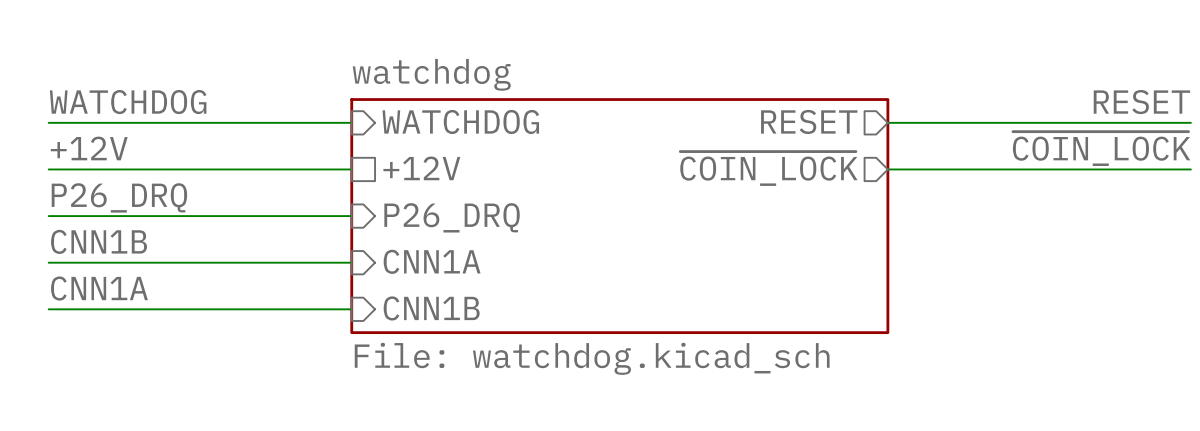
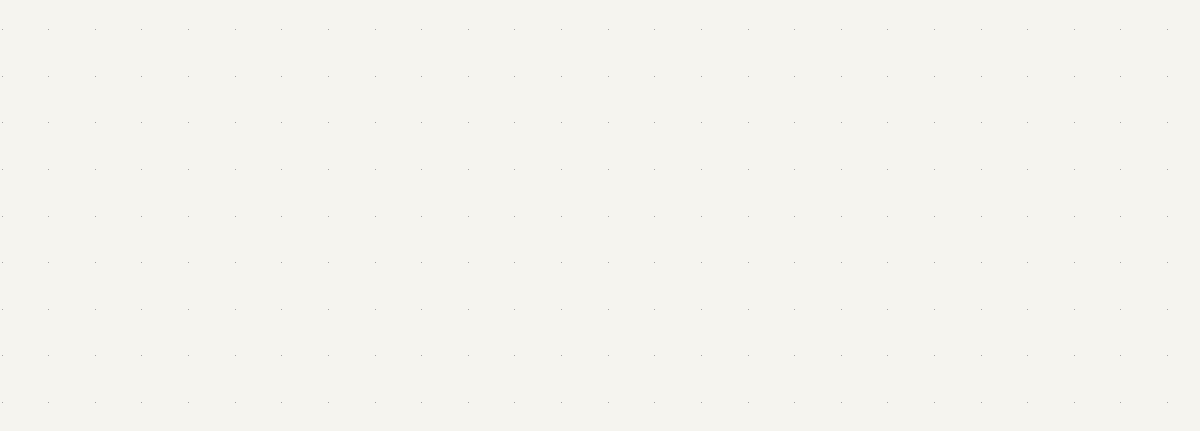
label: WATCHDOG (128, 102) -> none
label: RESET (1141, 102) -> none
sheet pin: WATCHDOG (460, 121) -> none
sheet pin: RESET (809, 121) -> none
wire: (48, 122) (351, 122) -> none
wire: (887, 122) (1190, 122) -> none
label: +12V (89, 148) -> none
label: ~{COIN_LOCK} (1101, 148) -> none
sheet pin: +12V (421, 168) -> none
sheet pin: ~{COIN_LOCK} (768, 168) -> none
wire: (48, 169) (351, 169) -> none
wire: (887, 169) (1190, 169) -> none
label: P26_DRQ (119, 197) -> none
wire: (48, 216) (351, 216) -> none
sheet watchdog: File: watchdog.kicad_sch (619, 216) -> none
sheet pin: P26_DRQ (452, 217) -> none
label: CNN1B (99, 241) -> none
sheet pin: CNN1A (432, 261) -> none
wire: (48, 262) (351, 262) -> none
label: CNN1A (99, 288) -> none
sheet pin: CNN1B (431, 308) -> none
wire: (48, 309) (351, 309) -> none

